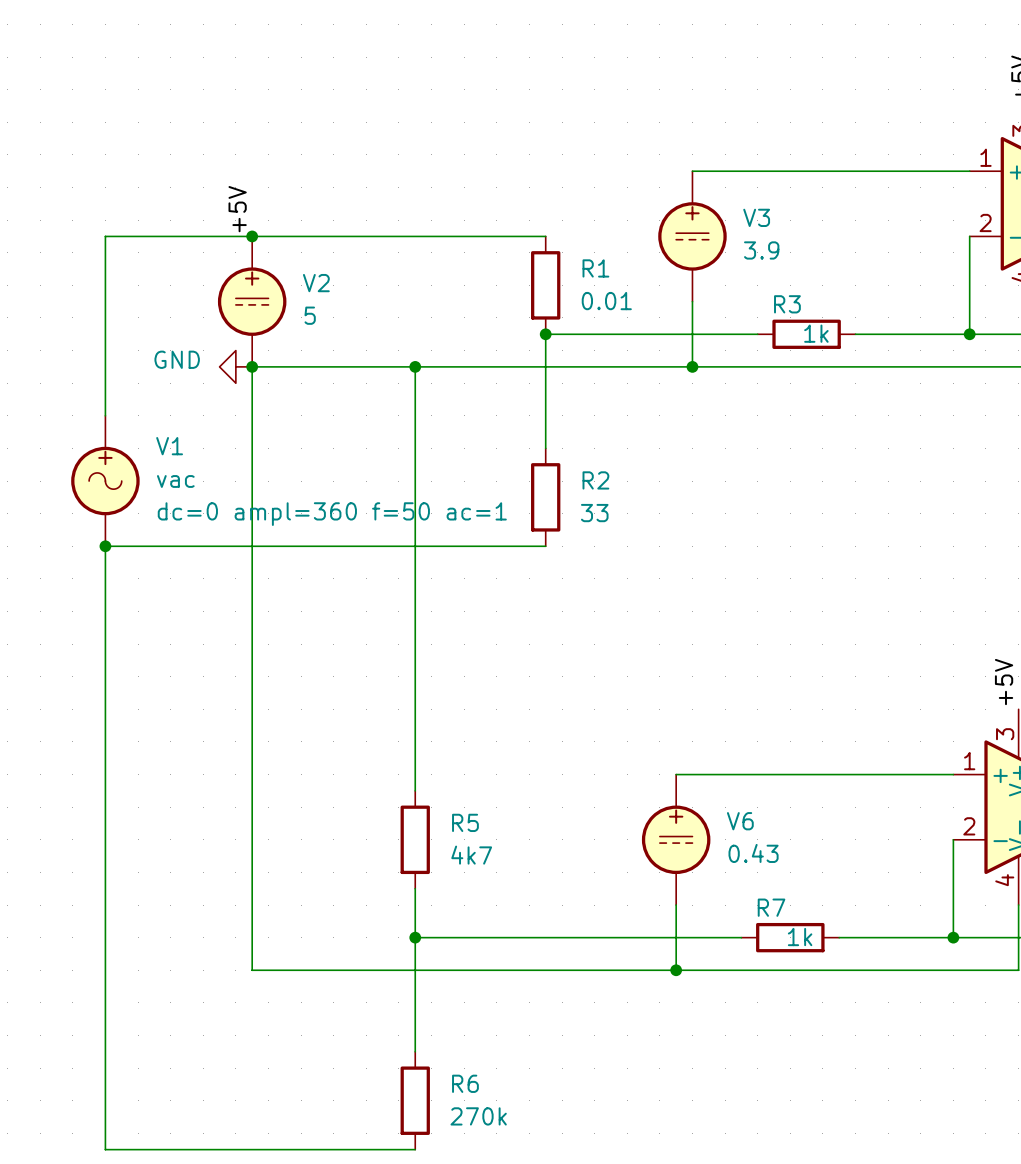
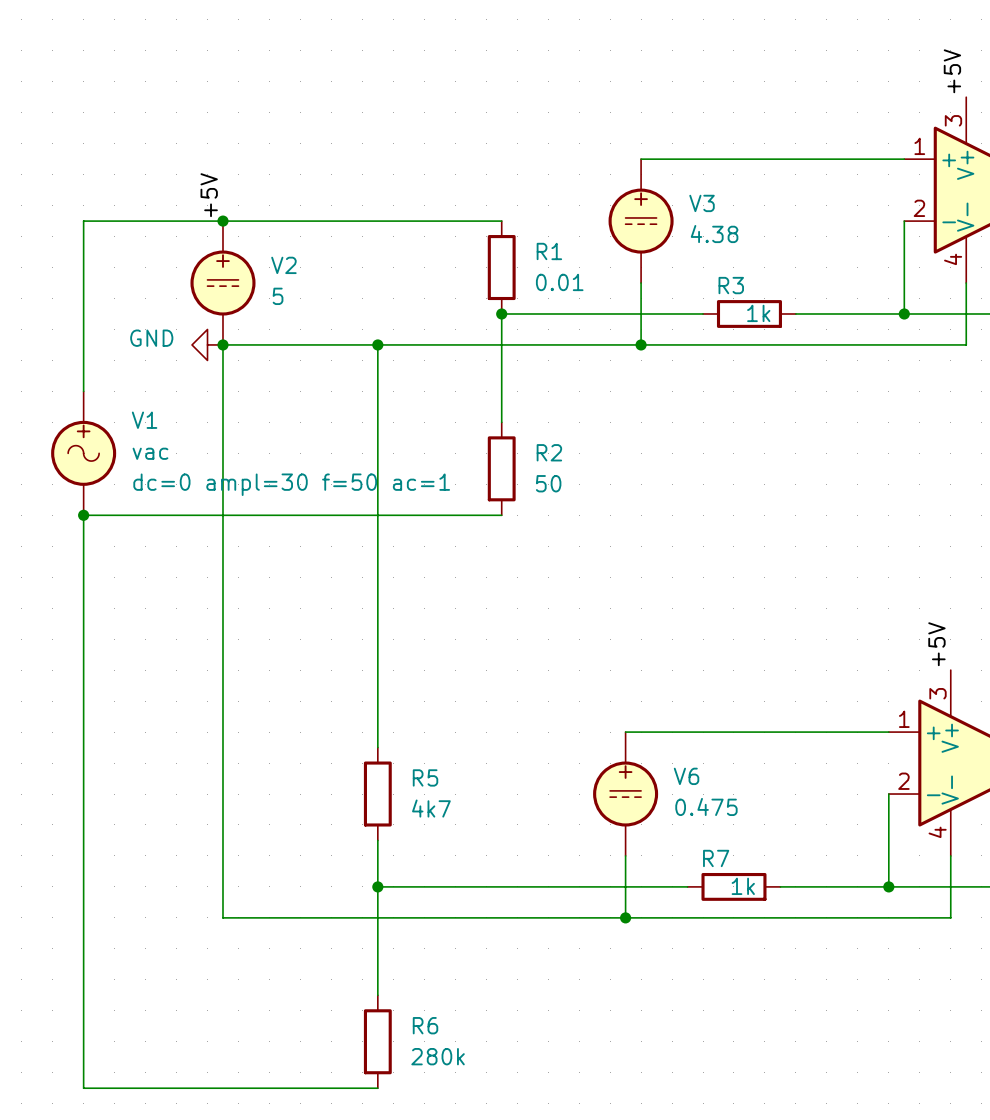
V3 value: 3.9 (761, 250) -> 4.38 (714, 234)
R2 value: 33 (594, 513) -> 50 (548, 483)
V1 text: dc=0 ampl=360 f=50 ac=1 (332, 514) -> dc=0 ampl=30 f=50 ac=1 (291, 484)
V6 value: 0.43 (753, 853) -> 0.475 (706, 806)
R6 value: 270k (478, 1116) -> 280k (438, 1056)

